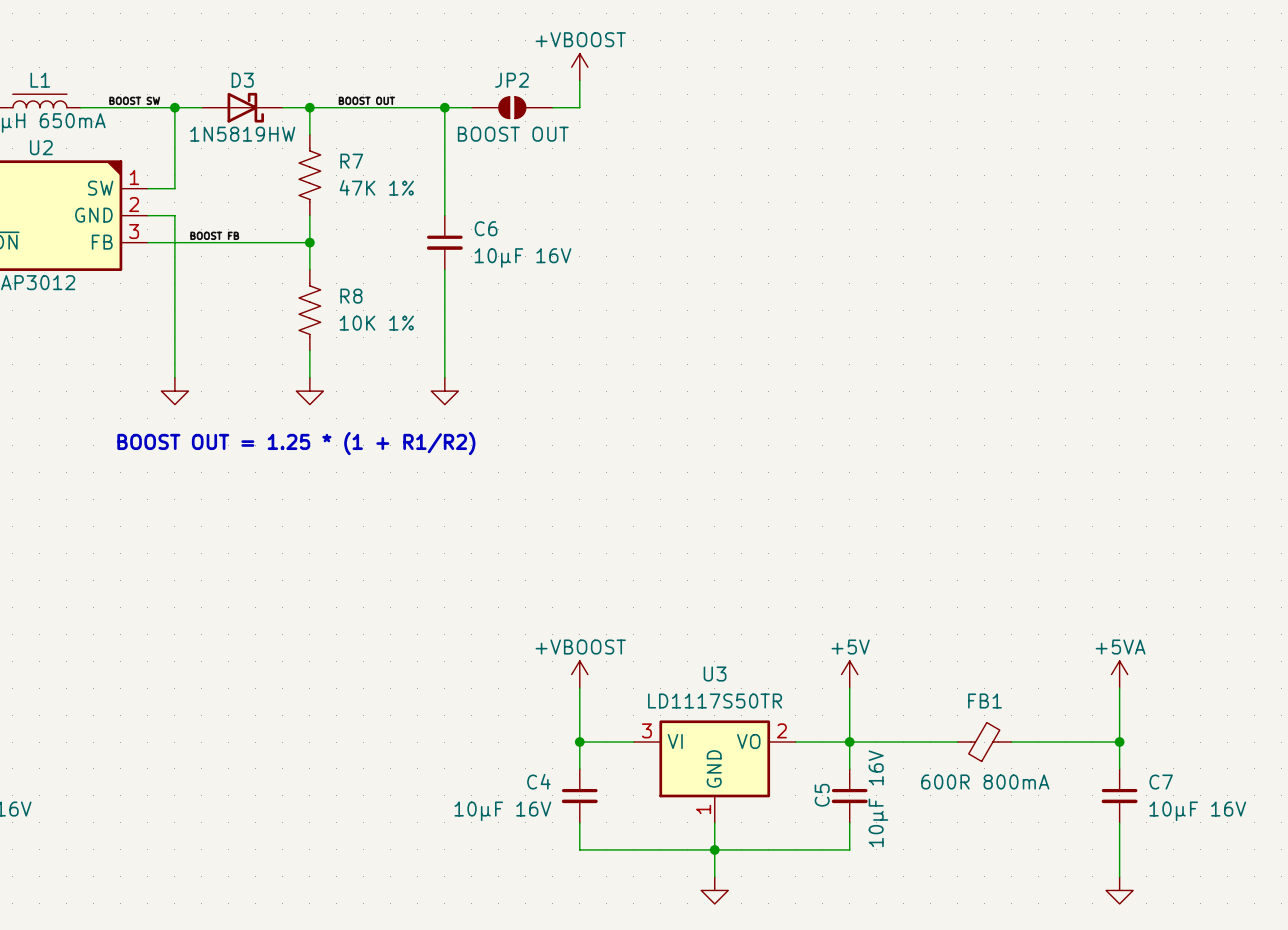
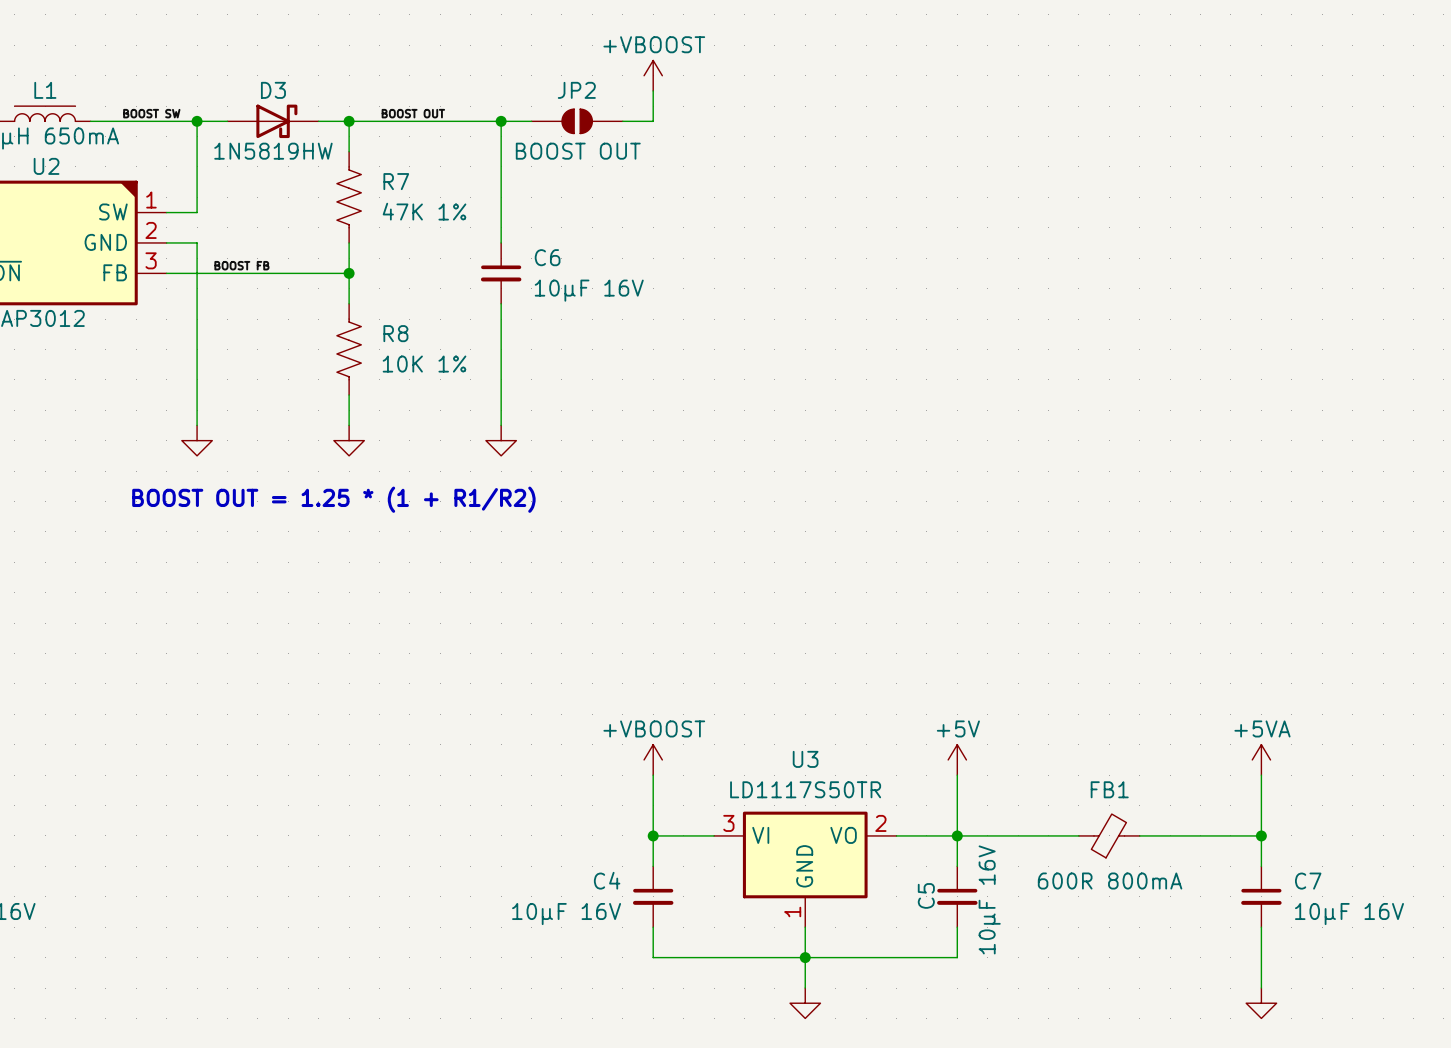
D3 flip: as is (245, 107) -> up-down (276, 121)

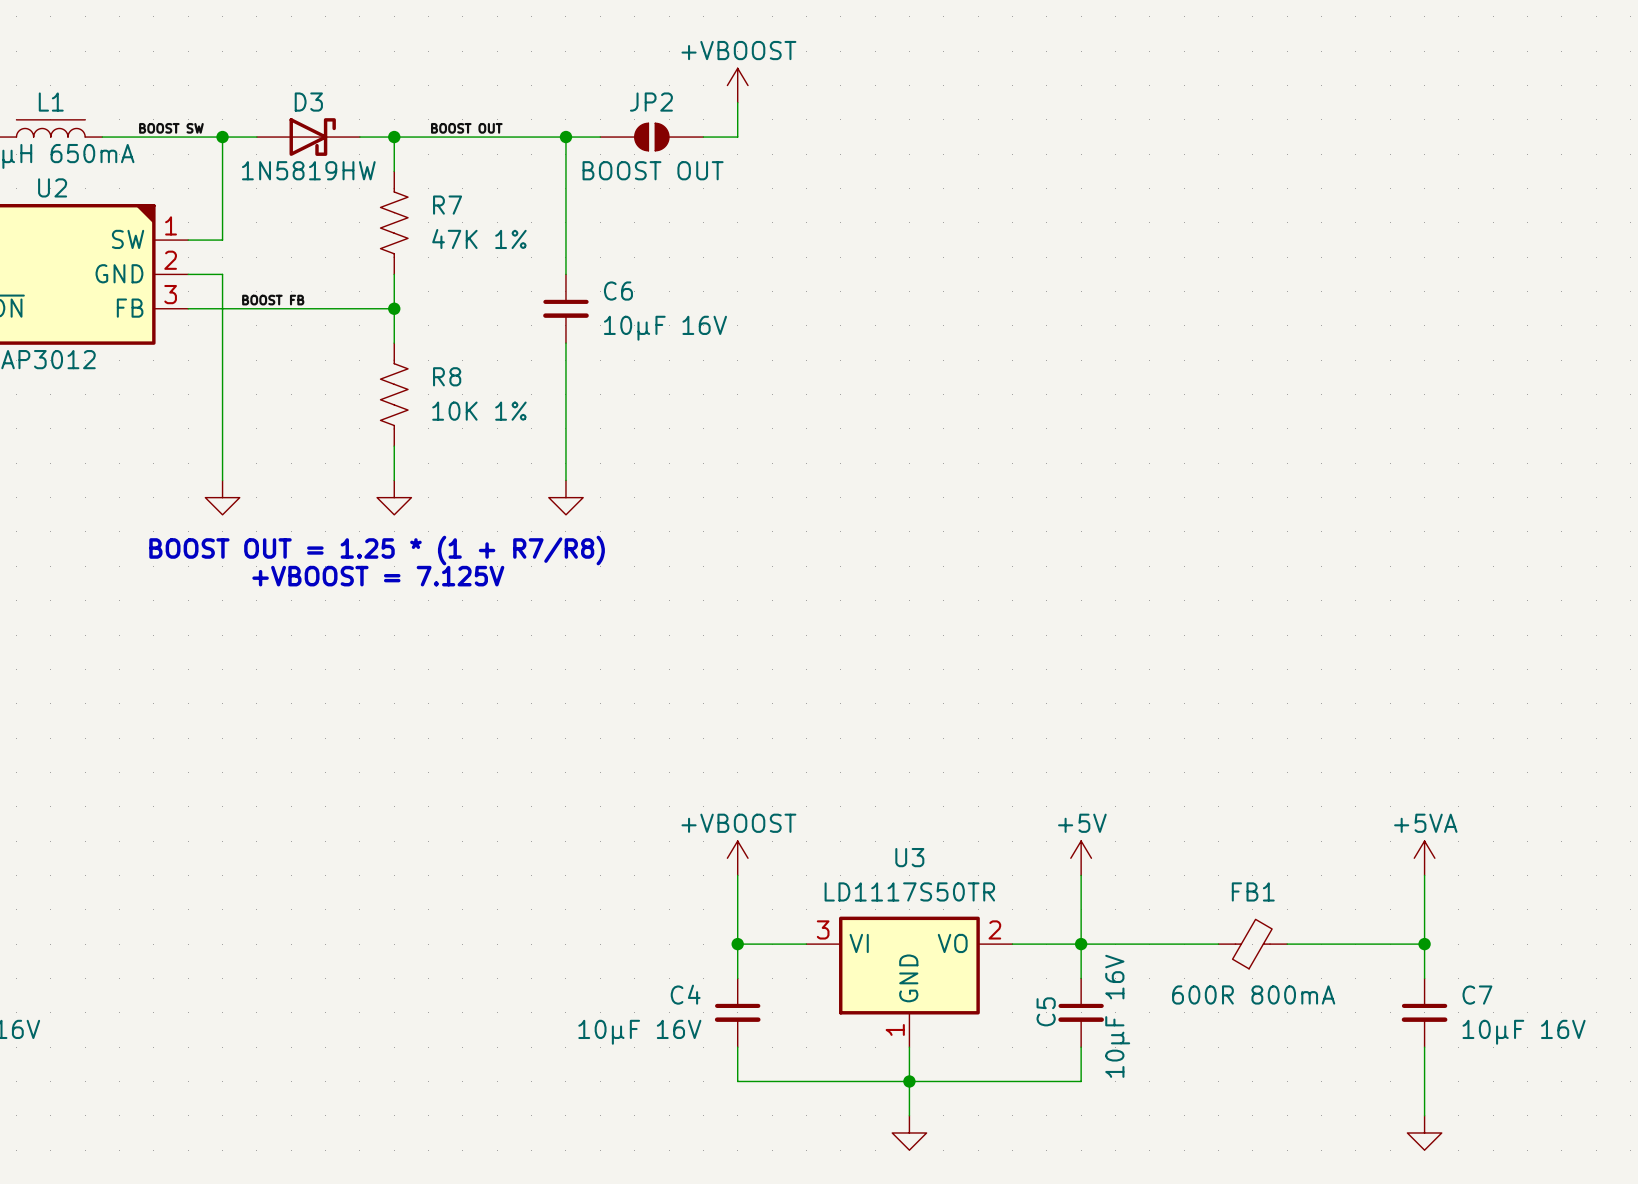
text: BOOST OUT = 1.25 * (1 + R1/R2) (333, 499) -> BOOST OUT = 1.25 * (1 + R7/R8) (377, 550)
text: none -> +VBOOST = 7.125V (378, 576)

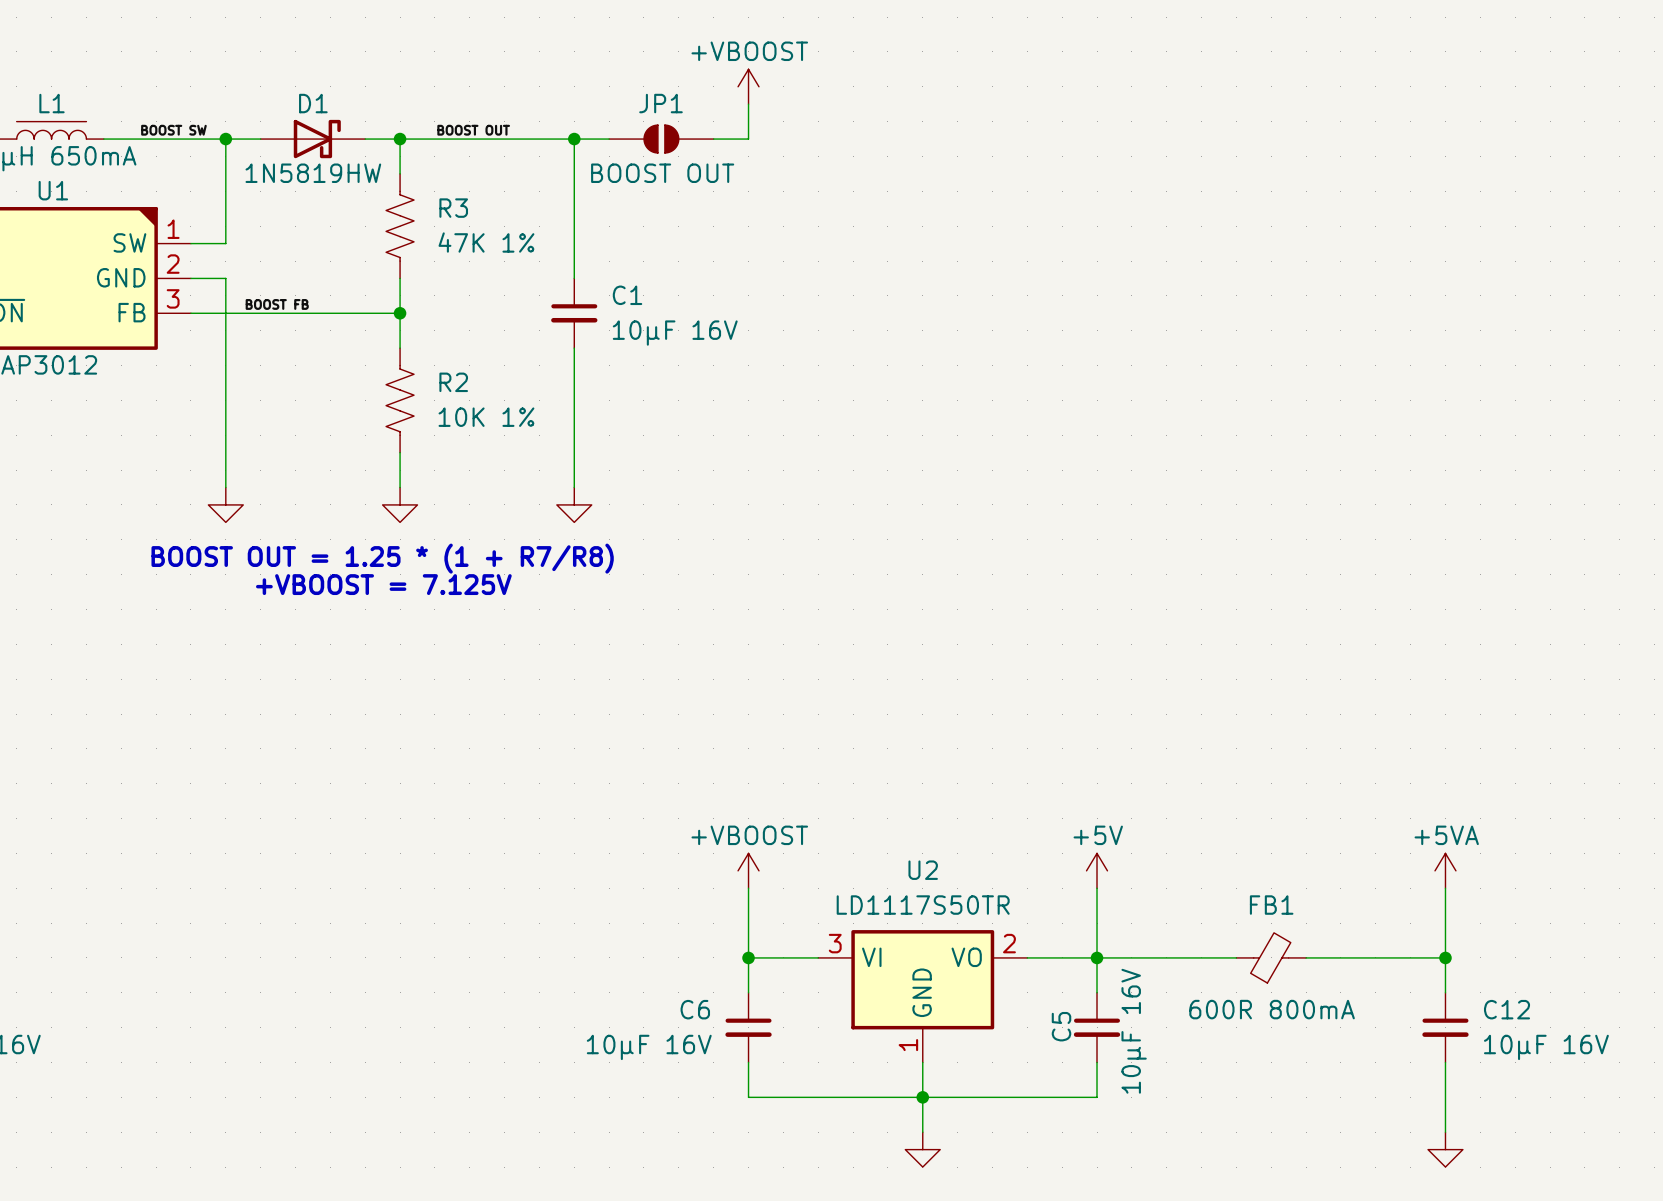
D3 name: D3 (308, 102) -> D1 (313, 103)
JP2 name: JP2 (651, 102) -> JP1 (660, 103)
U2 name: U2 (52, 187) -> U1 (53, 190)
R7 name: R7 (447, 205) -> R3 (453, 208)
C6 name: C6 (618, 291) -> C1 (627, 295)
R8 name: R8 (447, 376) -> R2 (453, 382)
U3 name: U3 (909, 857) -> U2 (923, 870)
C4 name: C4 (685, 994) -> C6 (695, 1009)
C7 name: C7 (1477, 995) -> C12 (1507, 1009)

